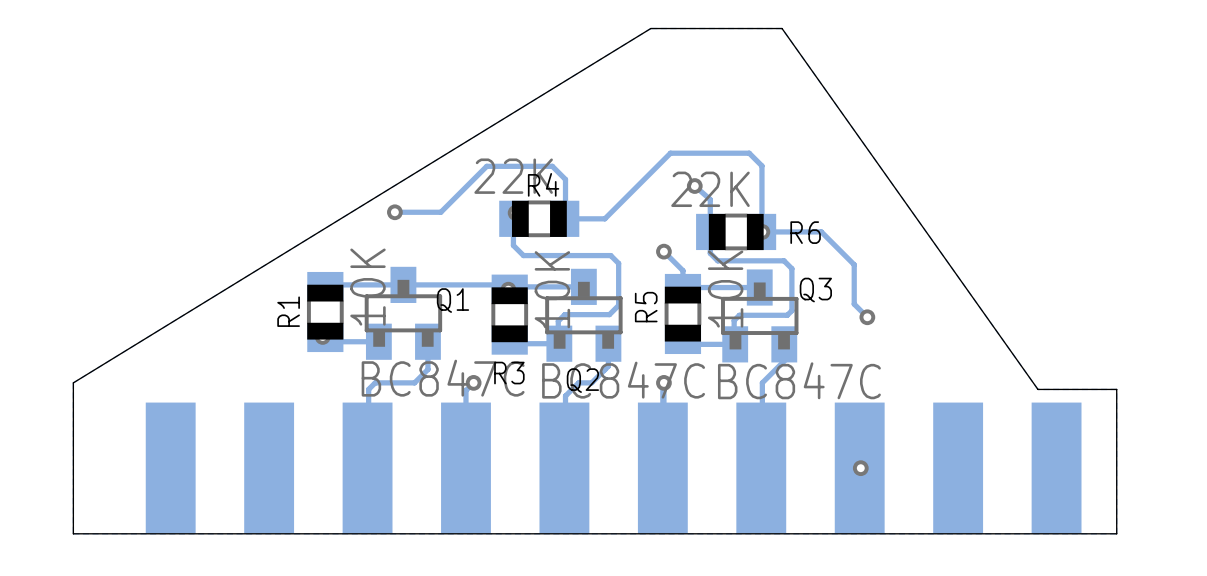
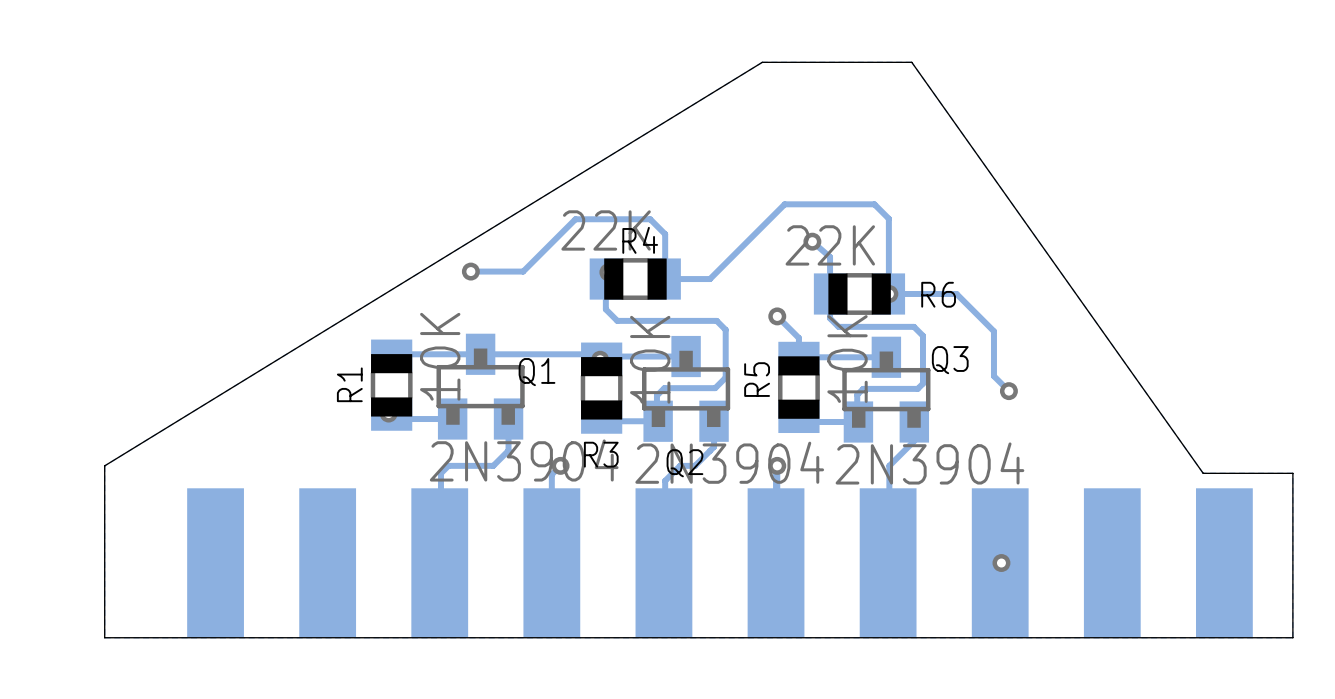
Q1 value: BC847C (443, 378) -> 2N3904 (524, 460)
Q2 value: BC847C (623, 380) -> 2N3904 (729, 462)
Q3 value: BC847C (799, 380) -> 2N3904 (929, 463)

